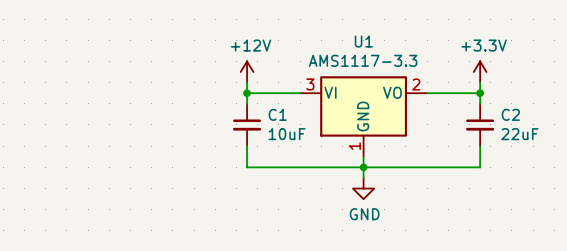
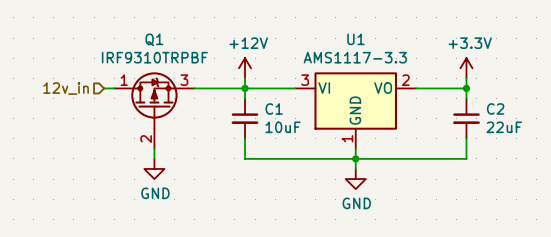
hierarchical label: none -> 12v_in (66, 88)
wire: none -> (104, 88) (114, 88)
wire: none -> (194, 88) (245, 88)
Q1: none -> IRF9310TRPBF (154, 110)
wire: none -> (154, 148) (154, 158)
power symbol: none -> GND (154, 168)

